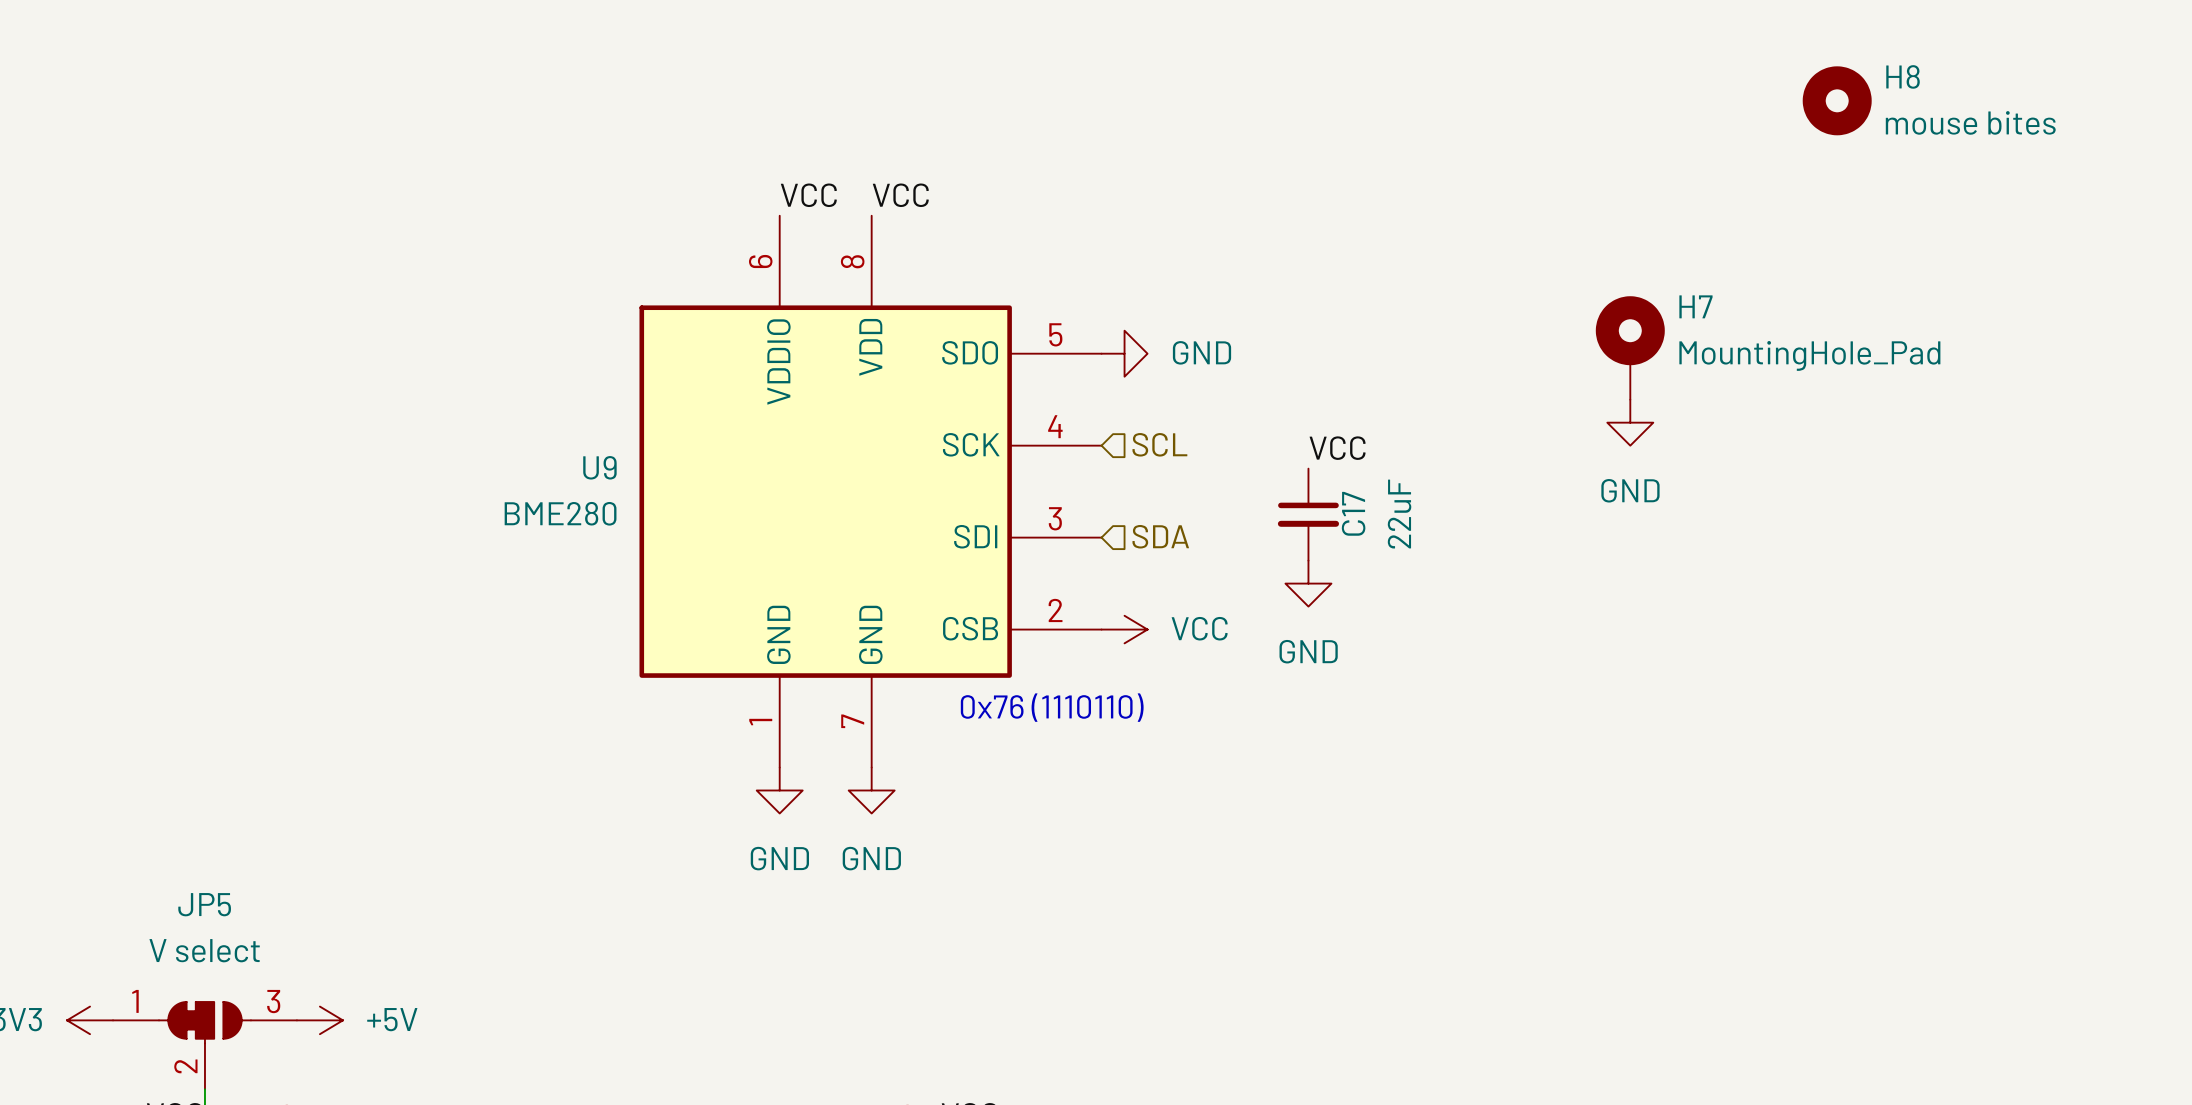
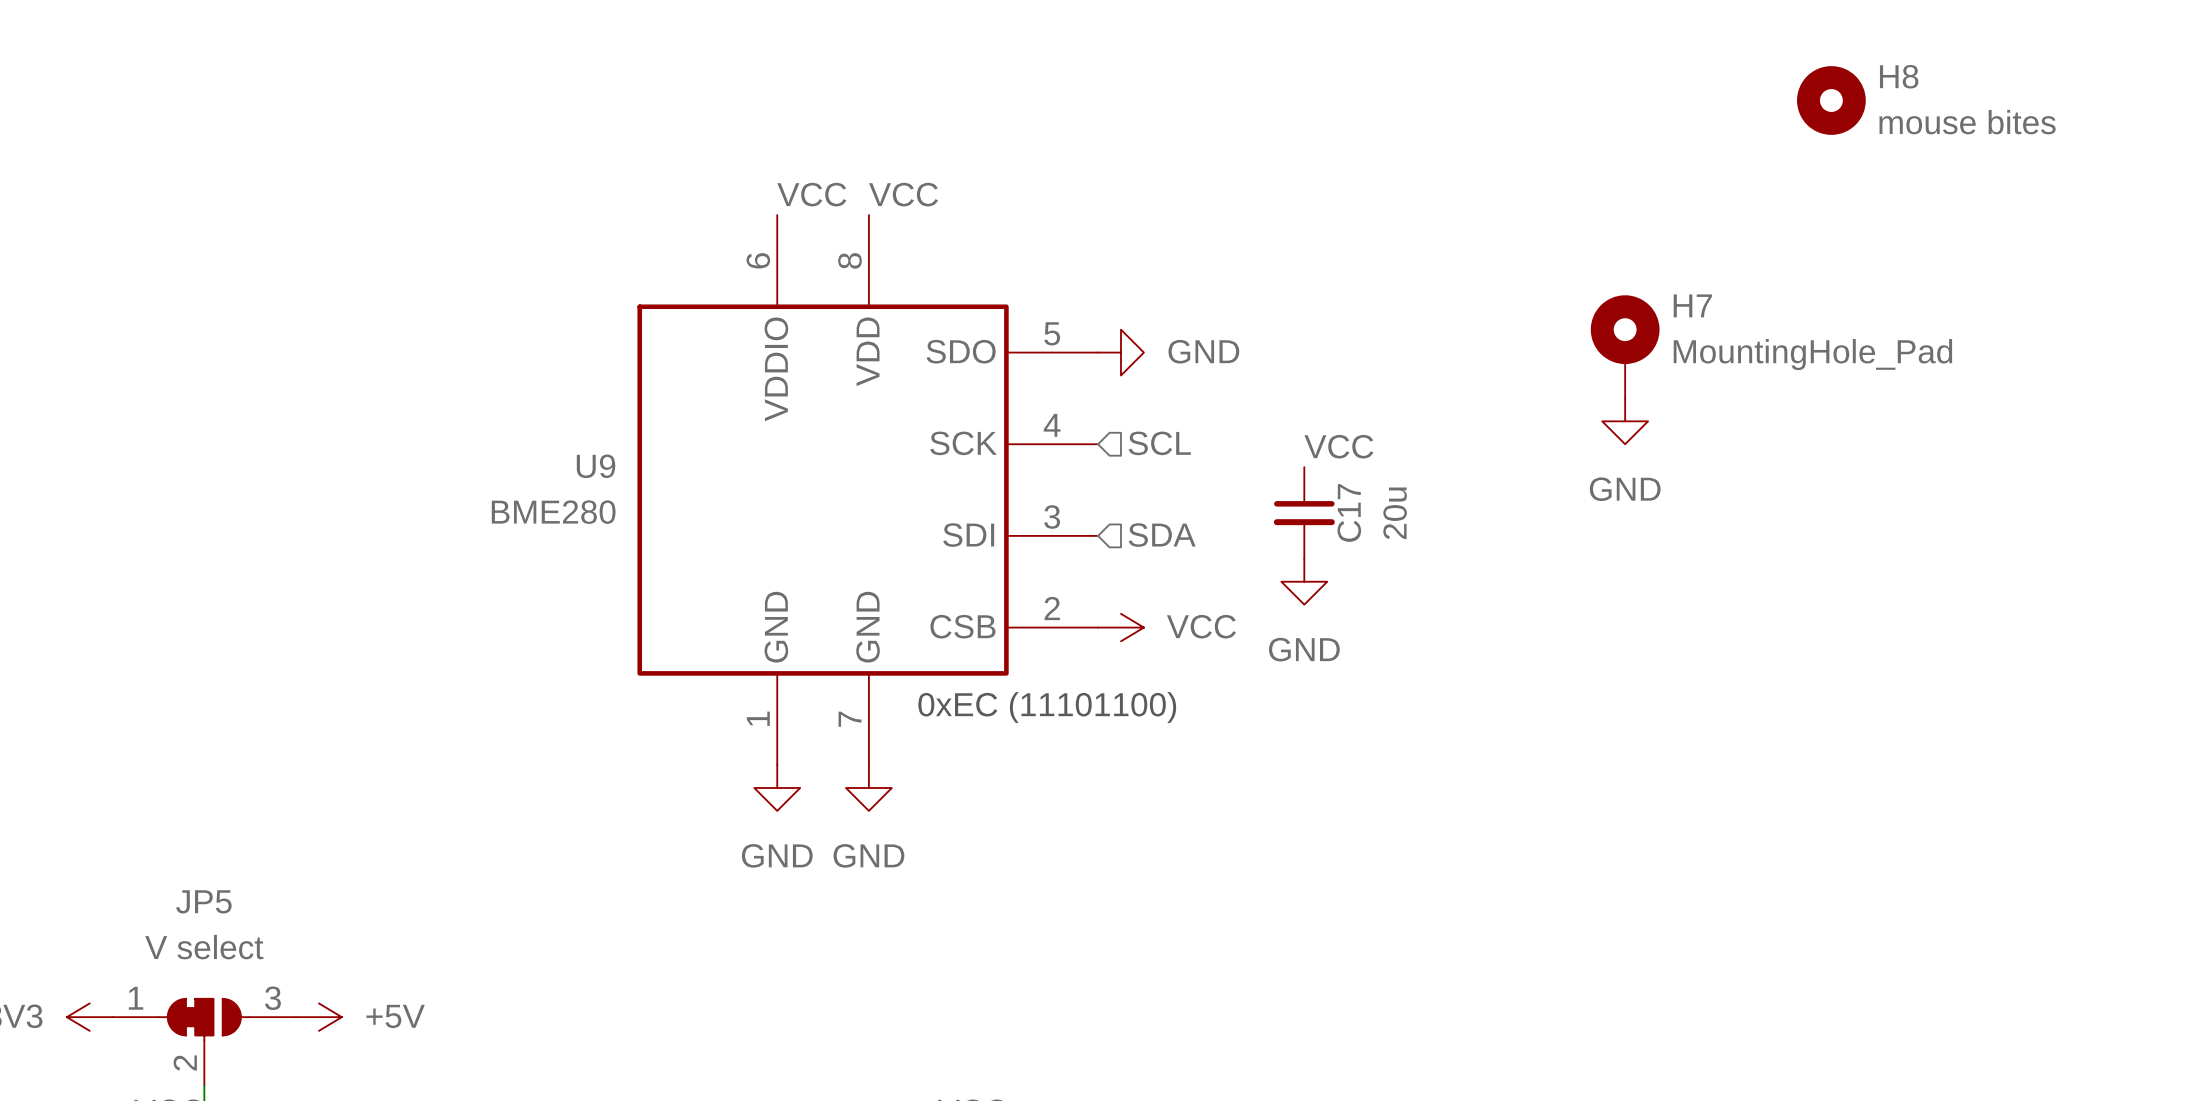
C17 value: 22uF (1399, 514) -> 20u (1395, 513)
text: 0x76 (1110110) (1052, 707) -> 0xEC (11101100) (1047, 707)

